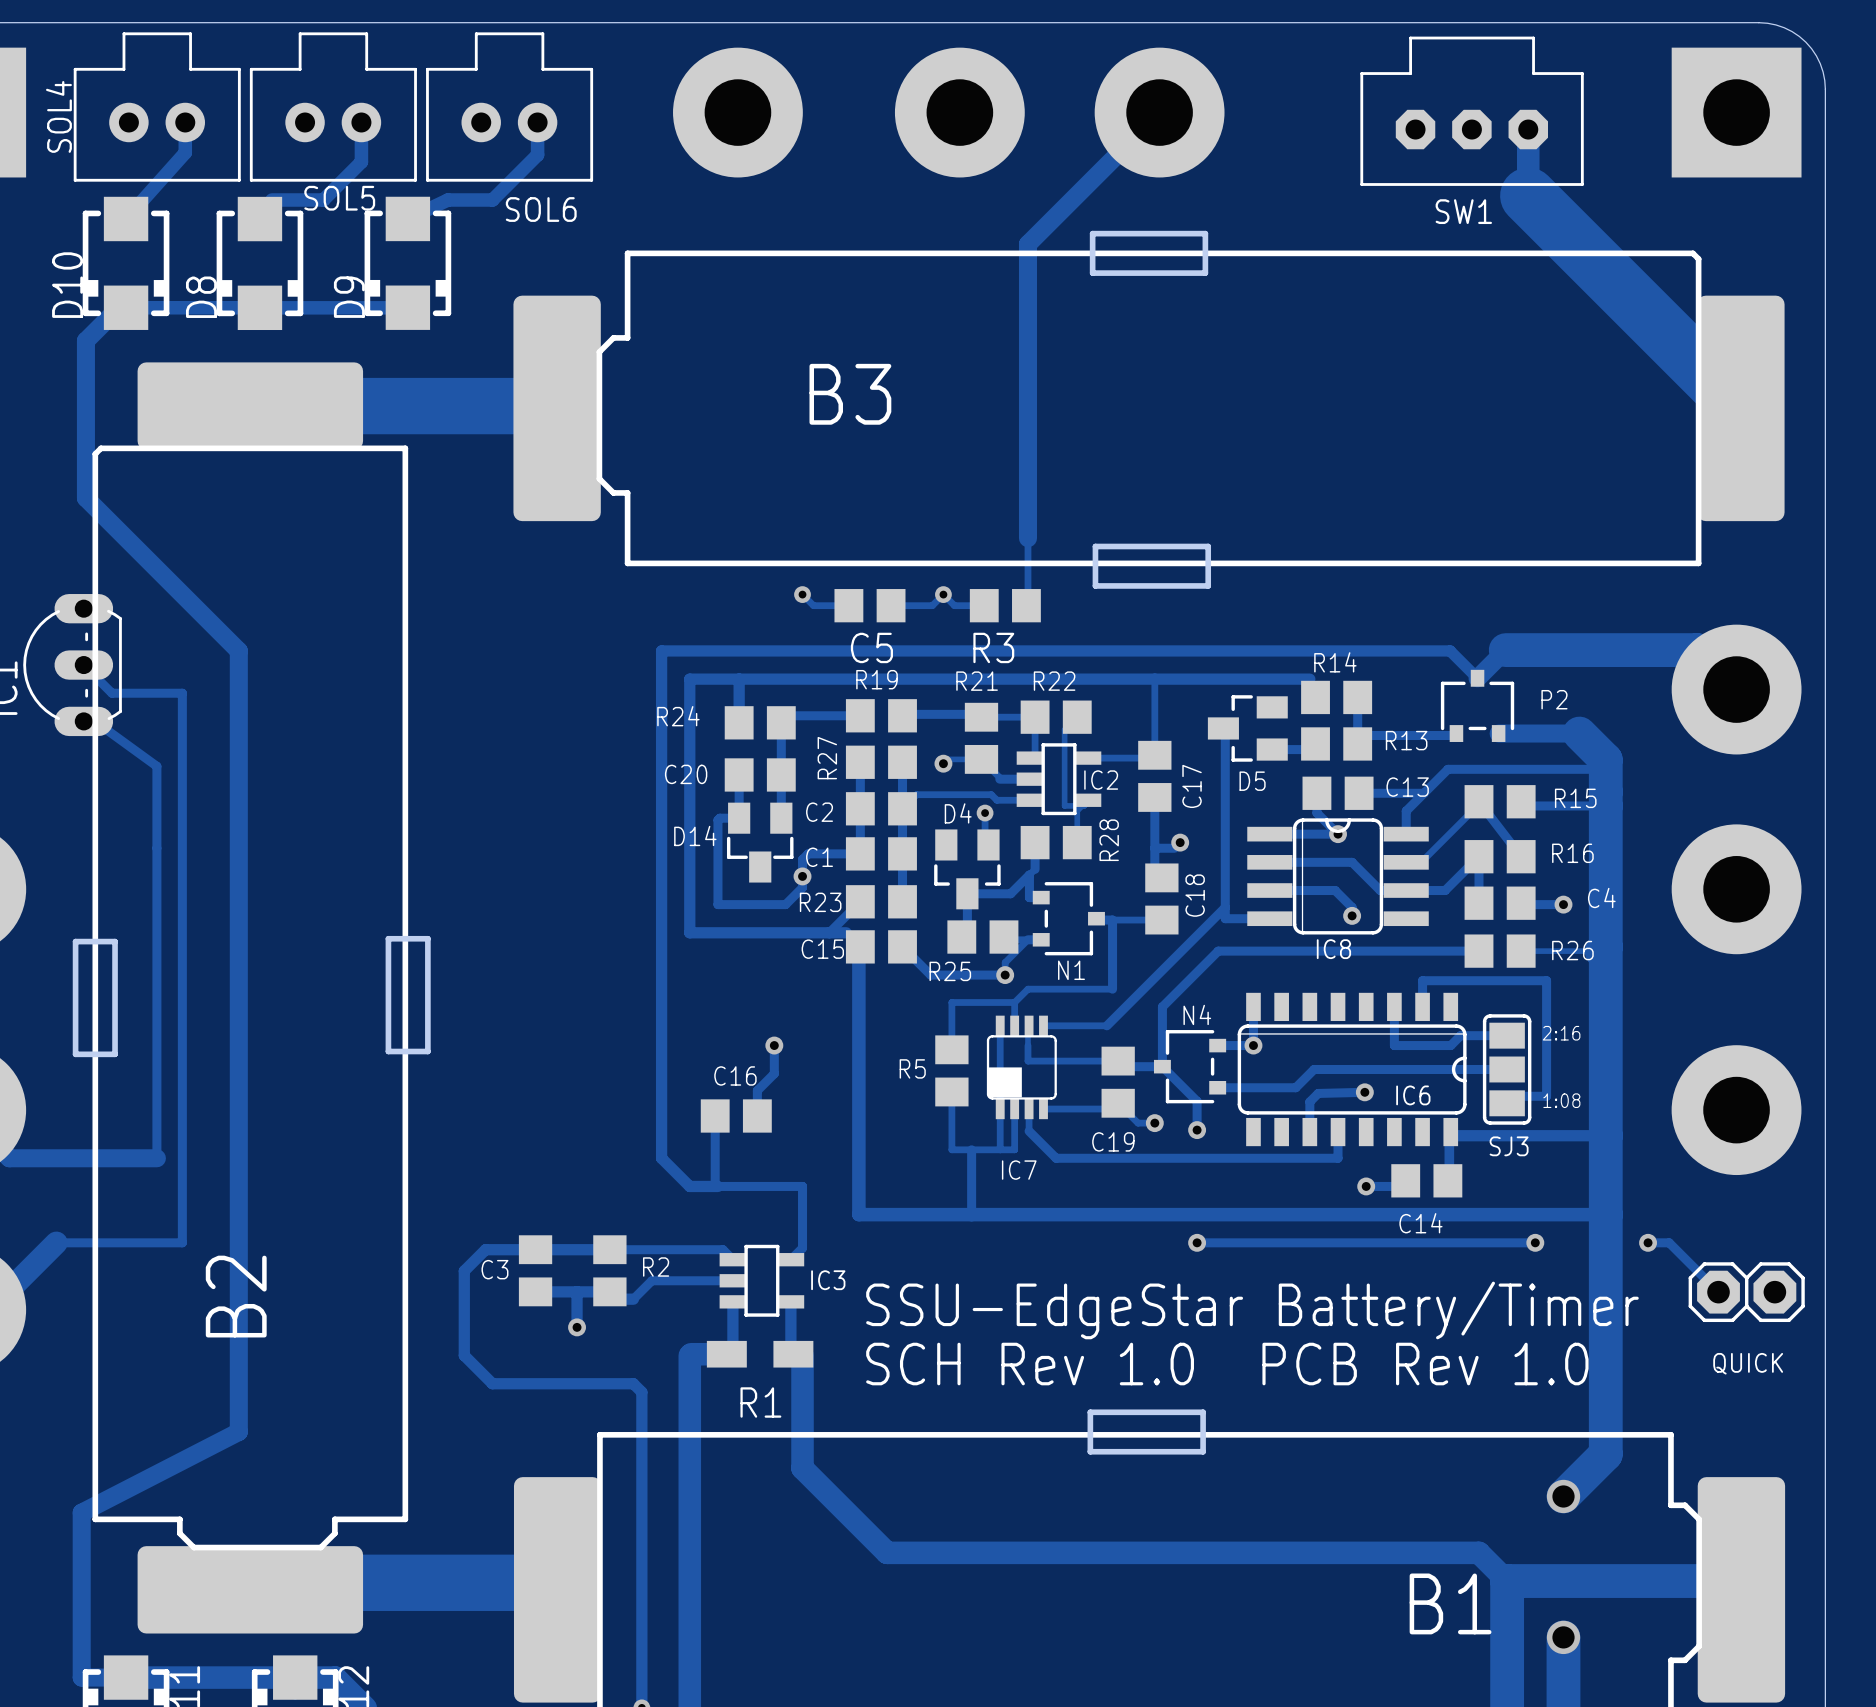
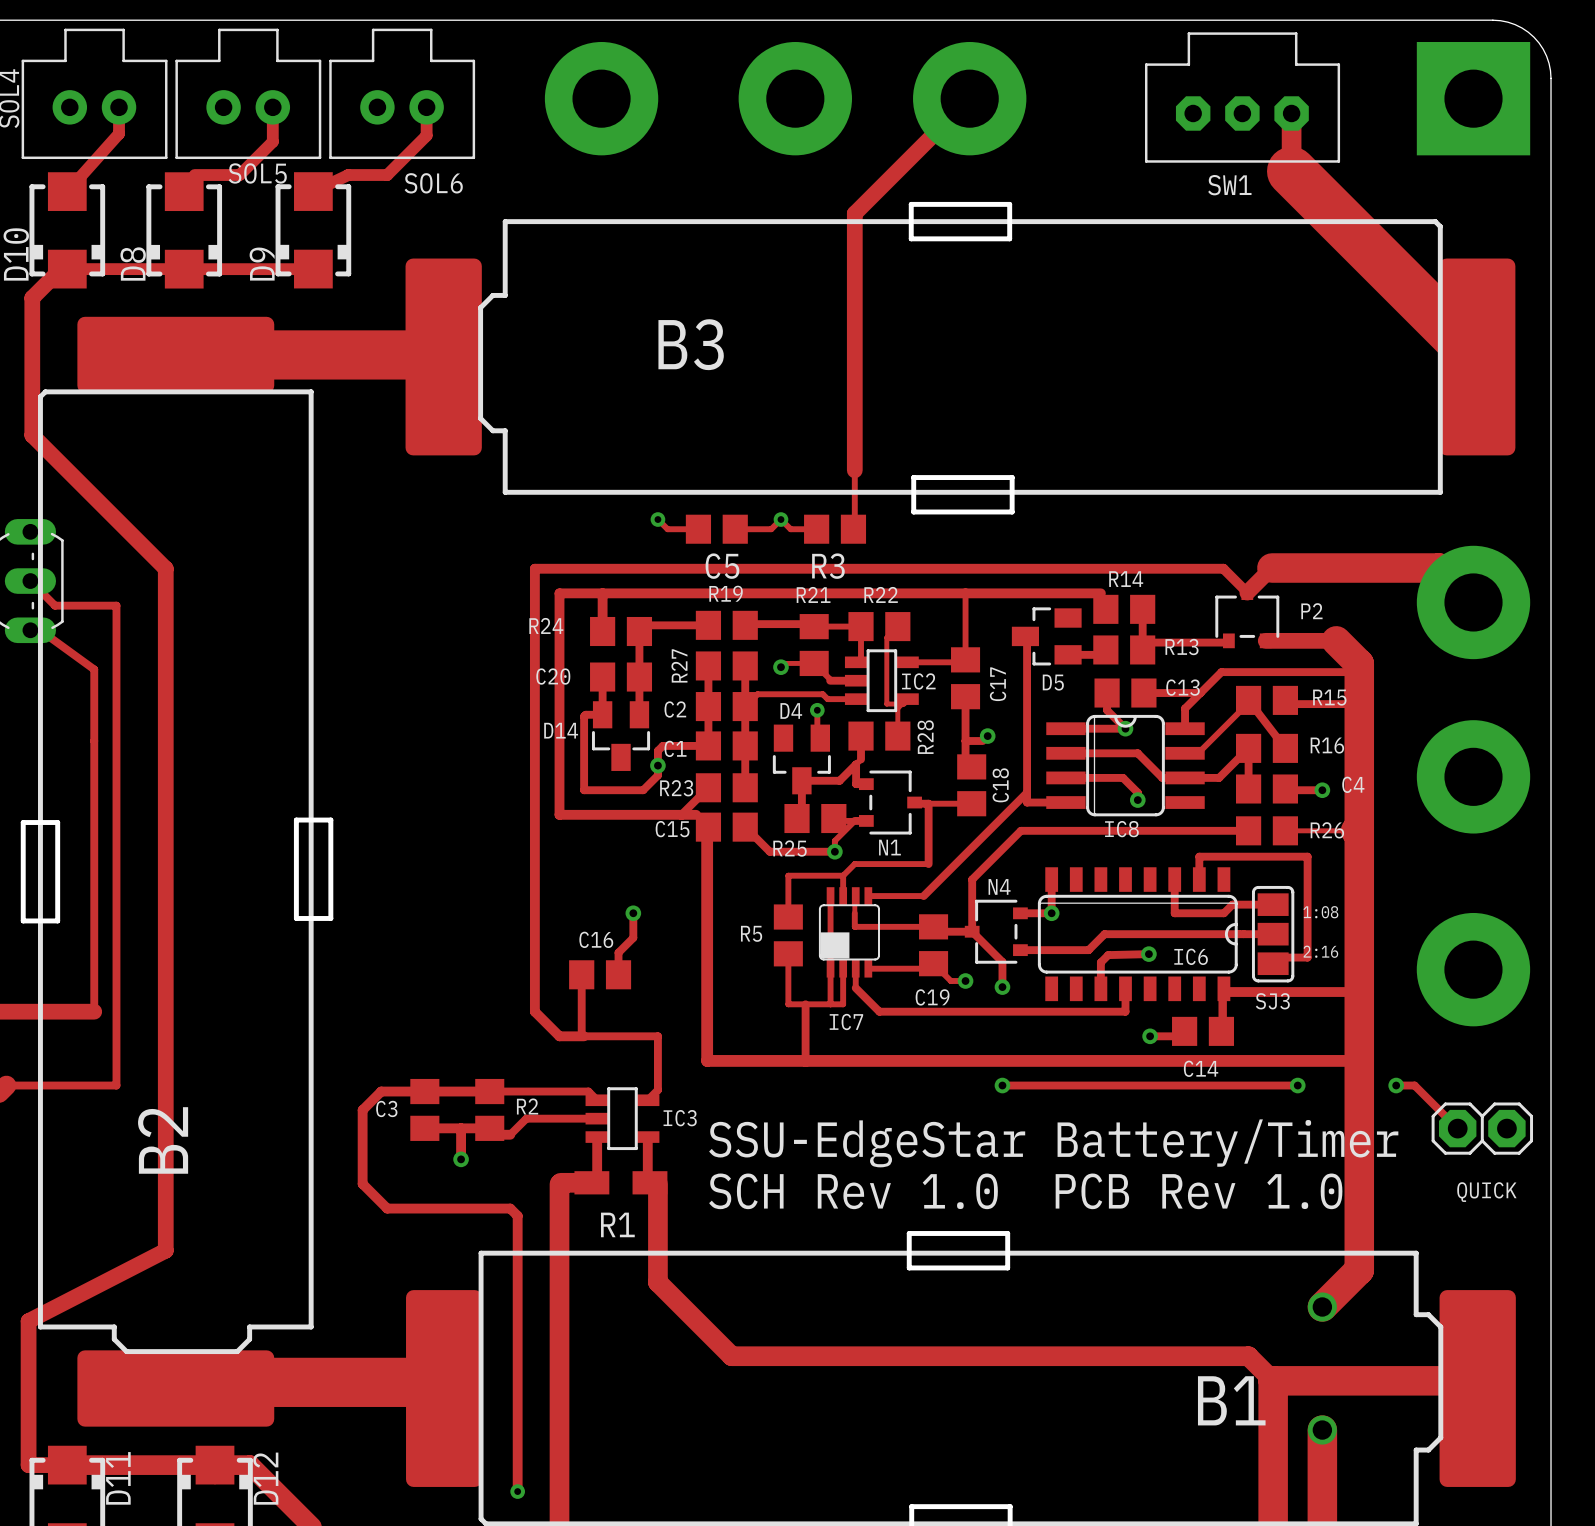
text position: 2:16 (1561, 1033) -> 2:16 (1320, 951)
text position: 1:08 (1561, 1100) -> 1:08 (1320, 912)

